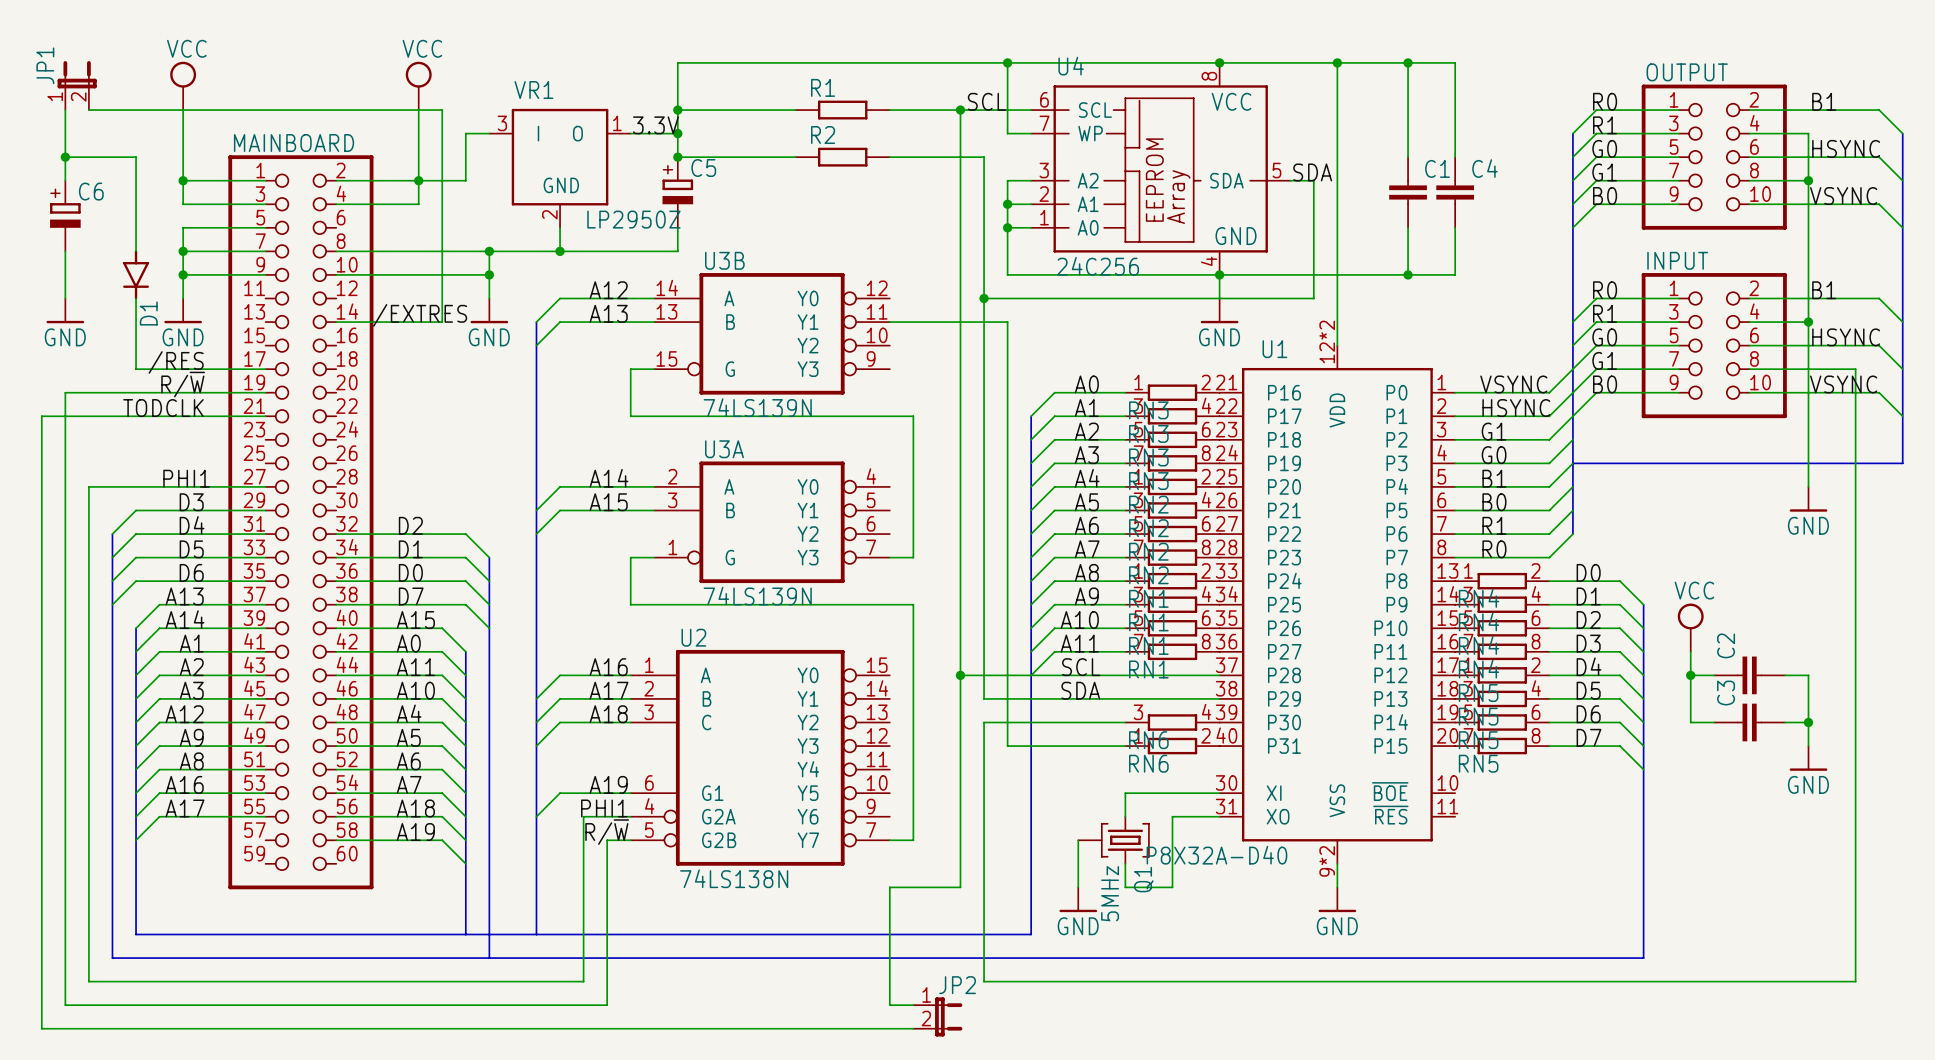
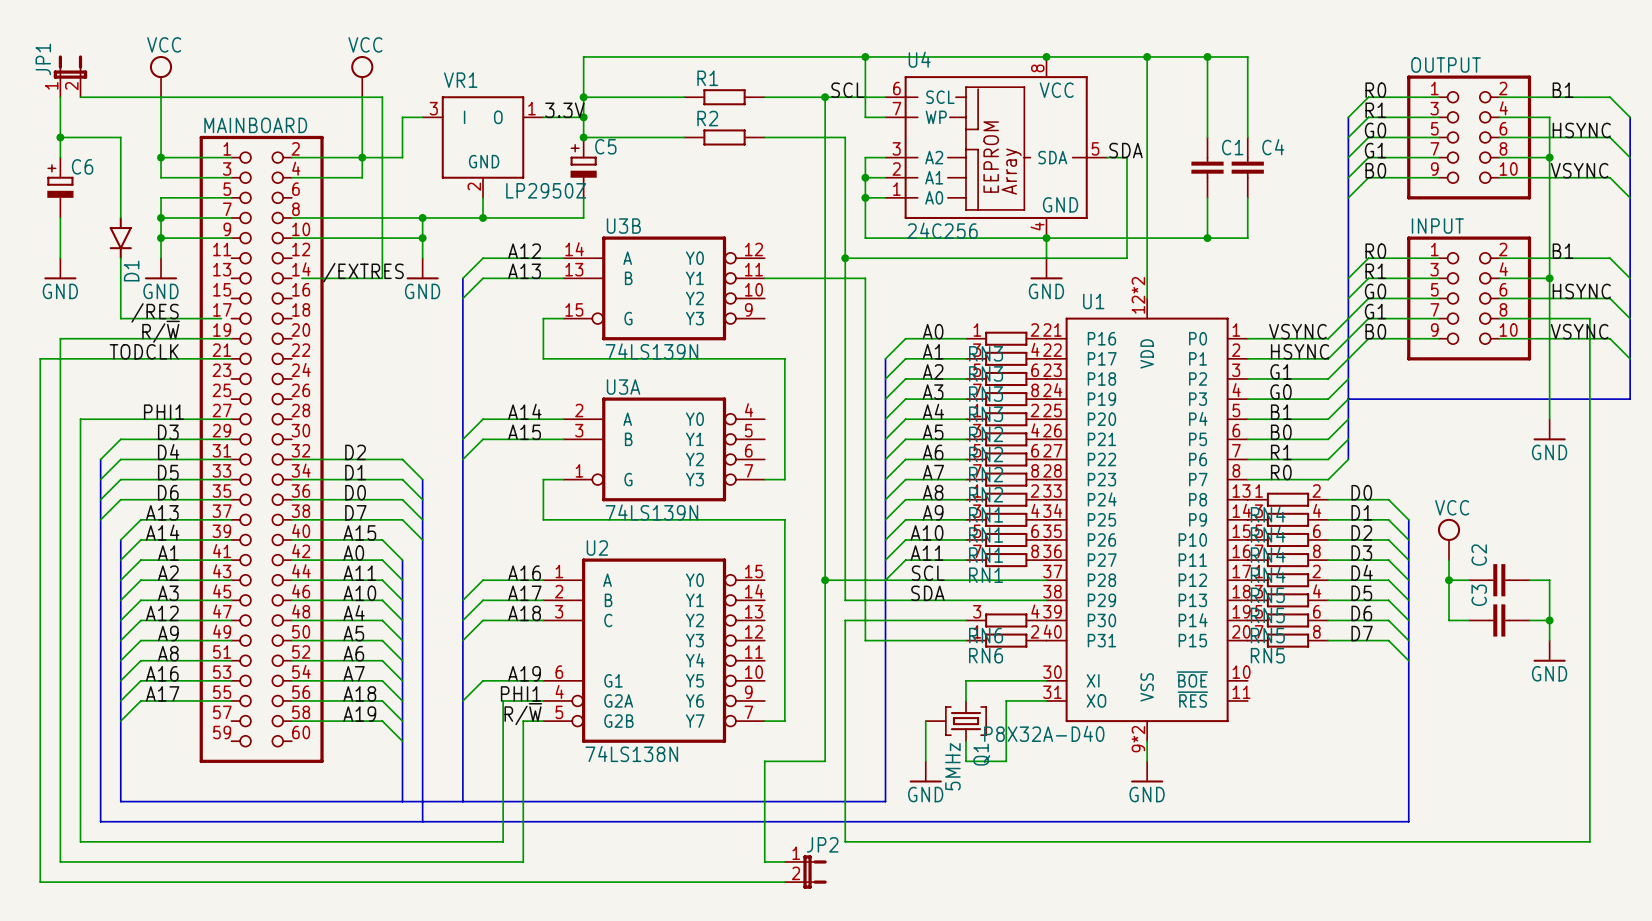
wire: (336, 322) (348, 322) -> none
wire: (253, 369) (265, 369) -> none

